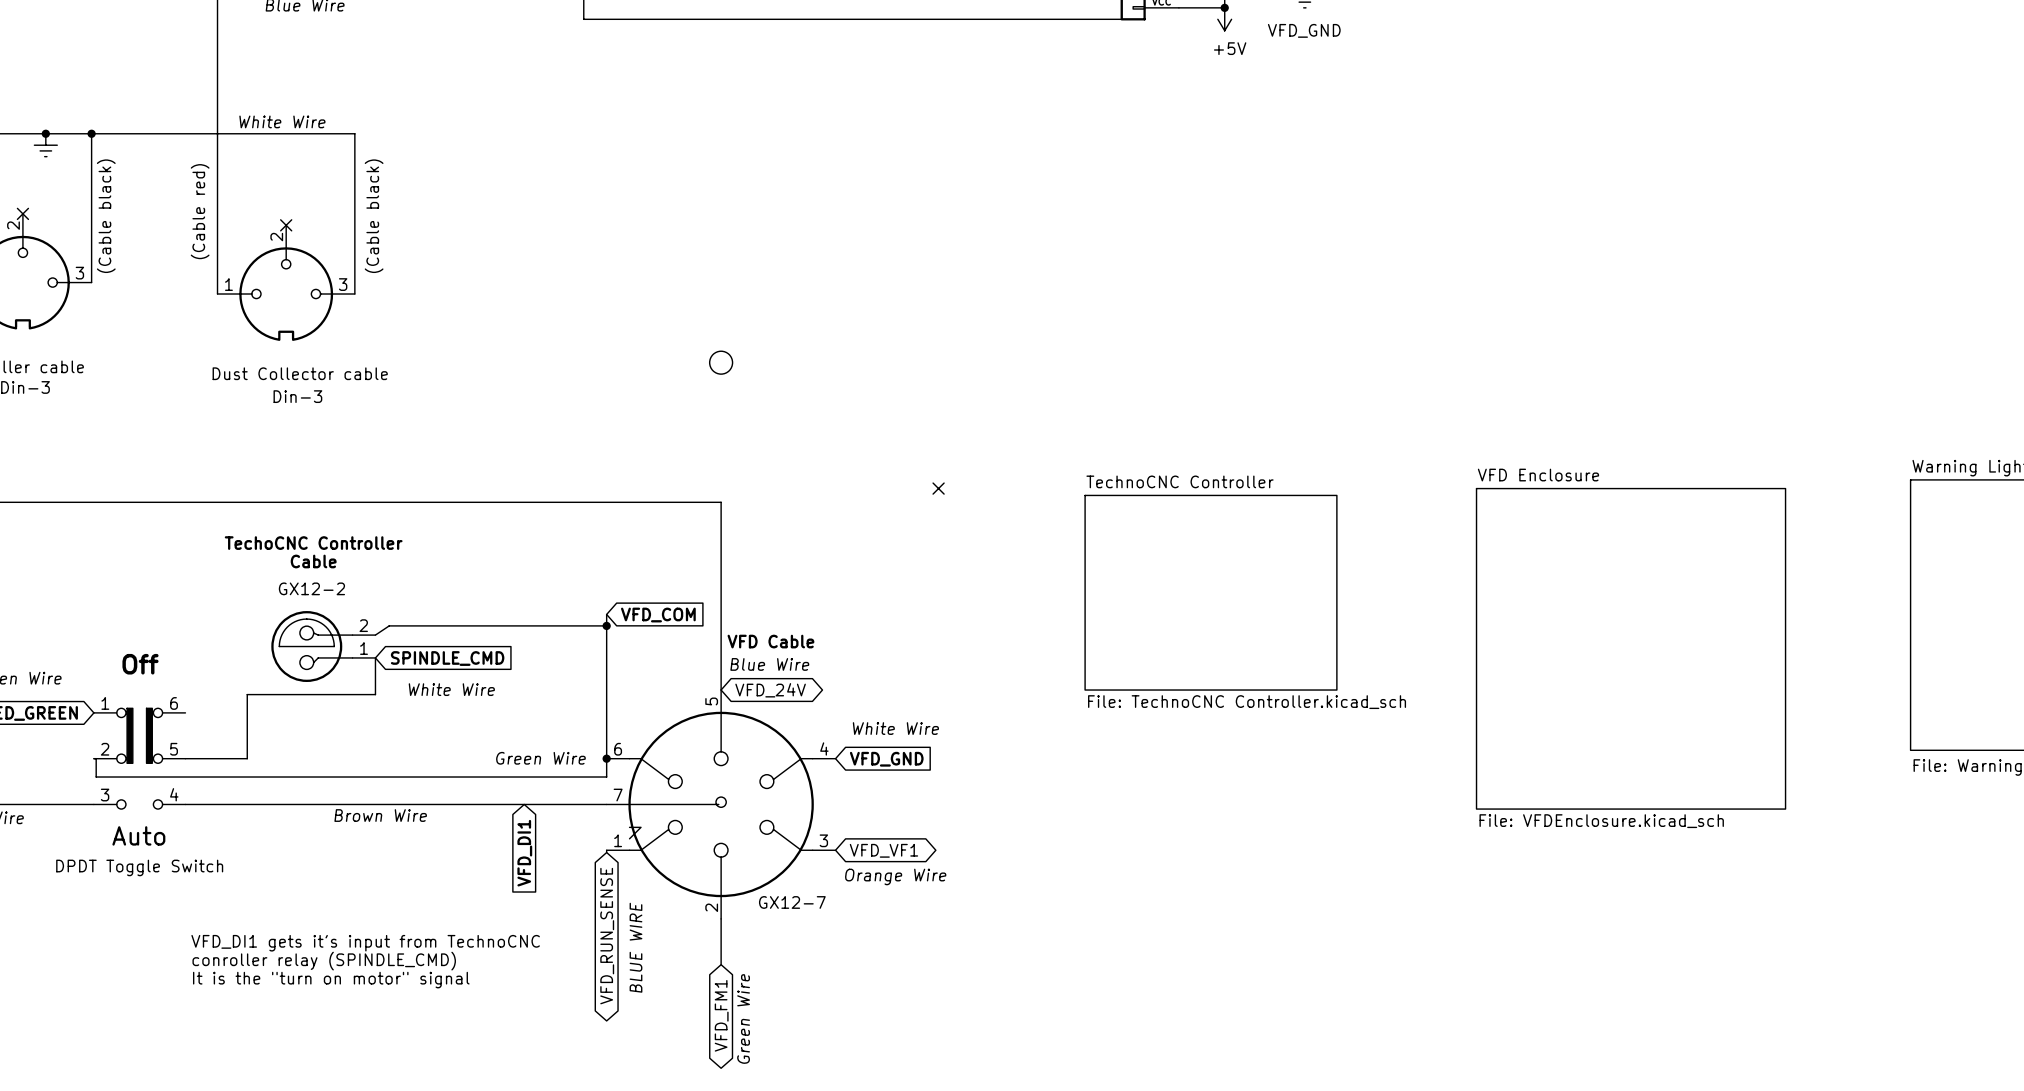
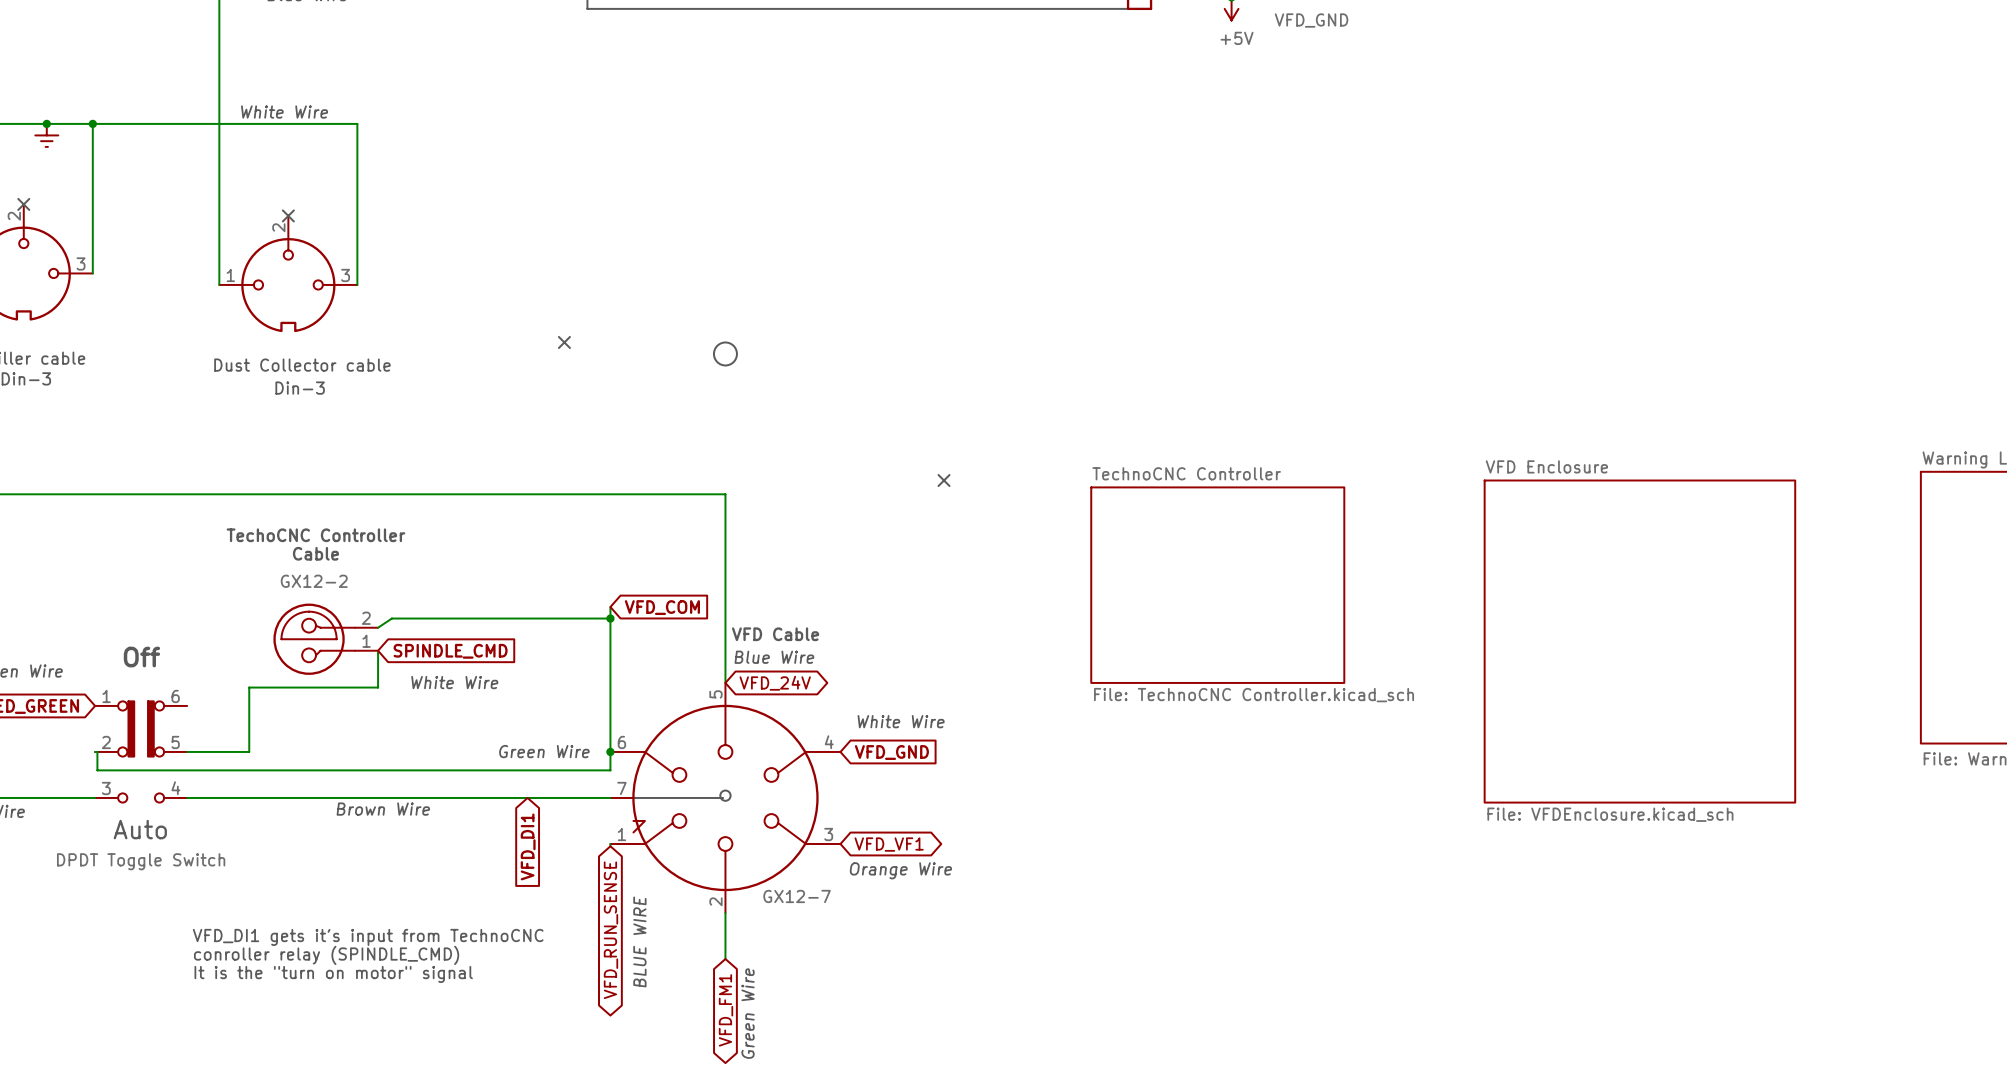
text: (Cable red) (200, 211) -> none
text: (Cable black) (106, 216) -> none
text: (Cable black) (374, 216) -> none
no-connect mark: none -> (564, 342)

